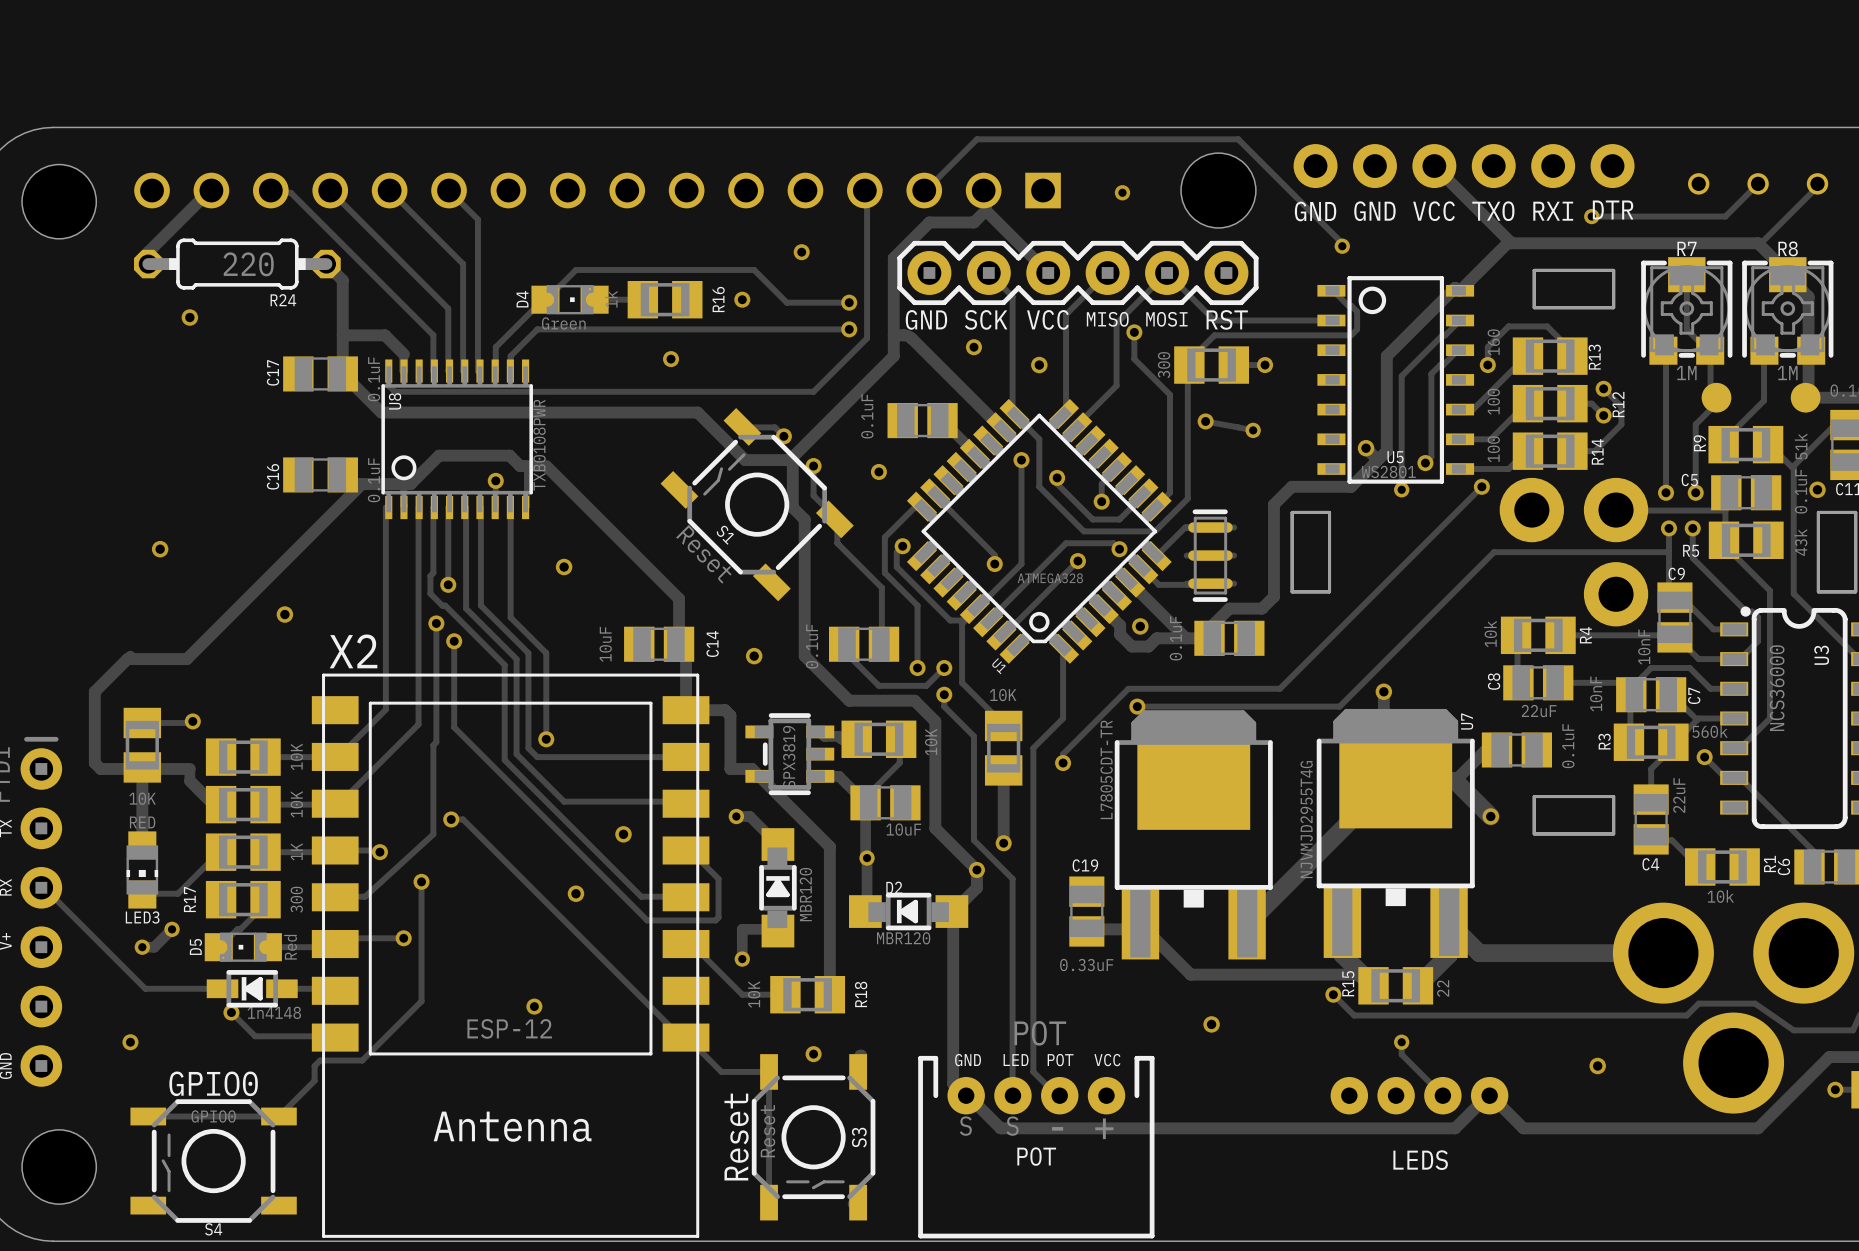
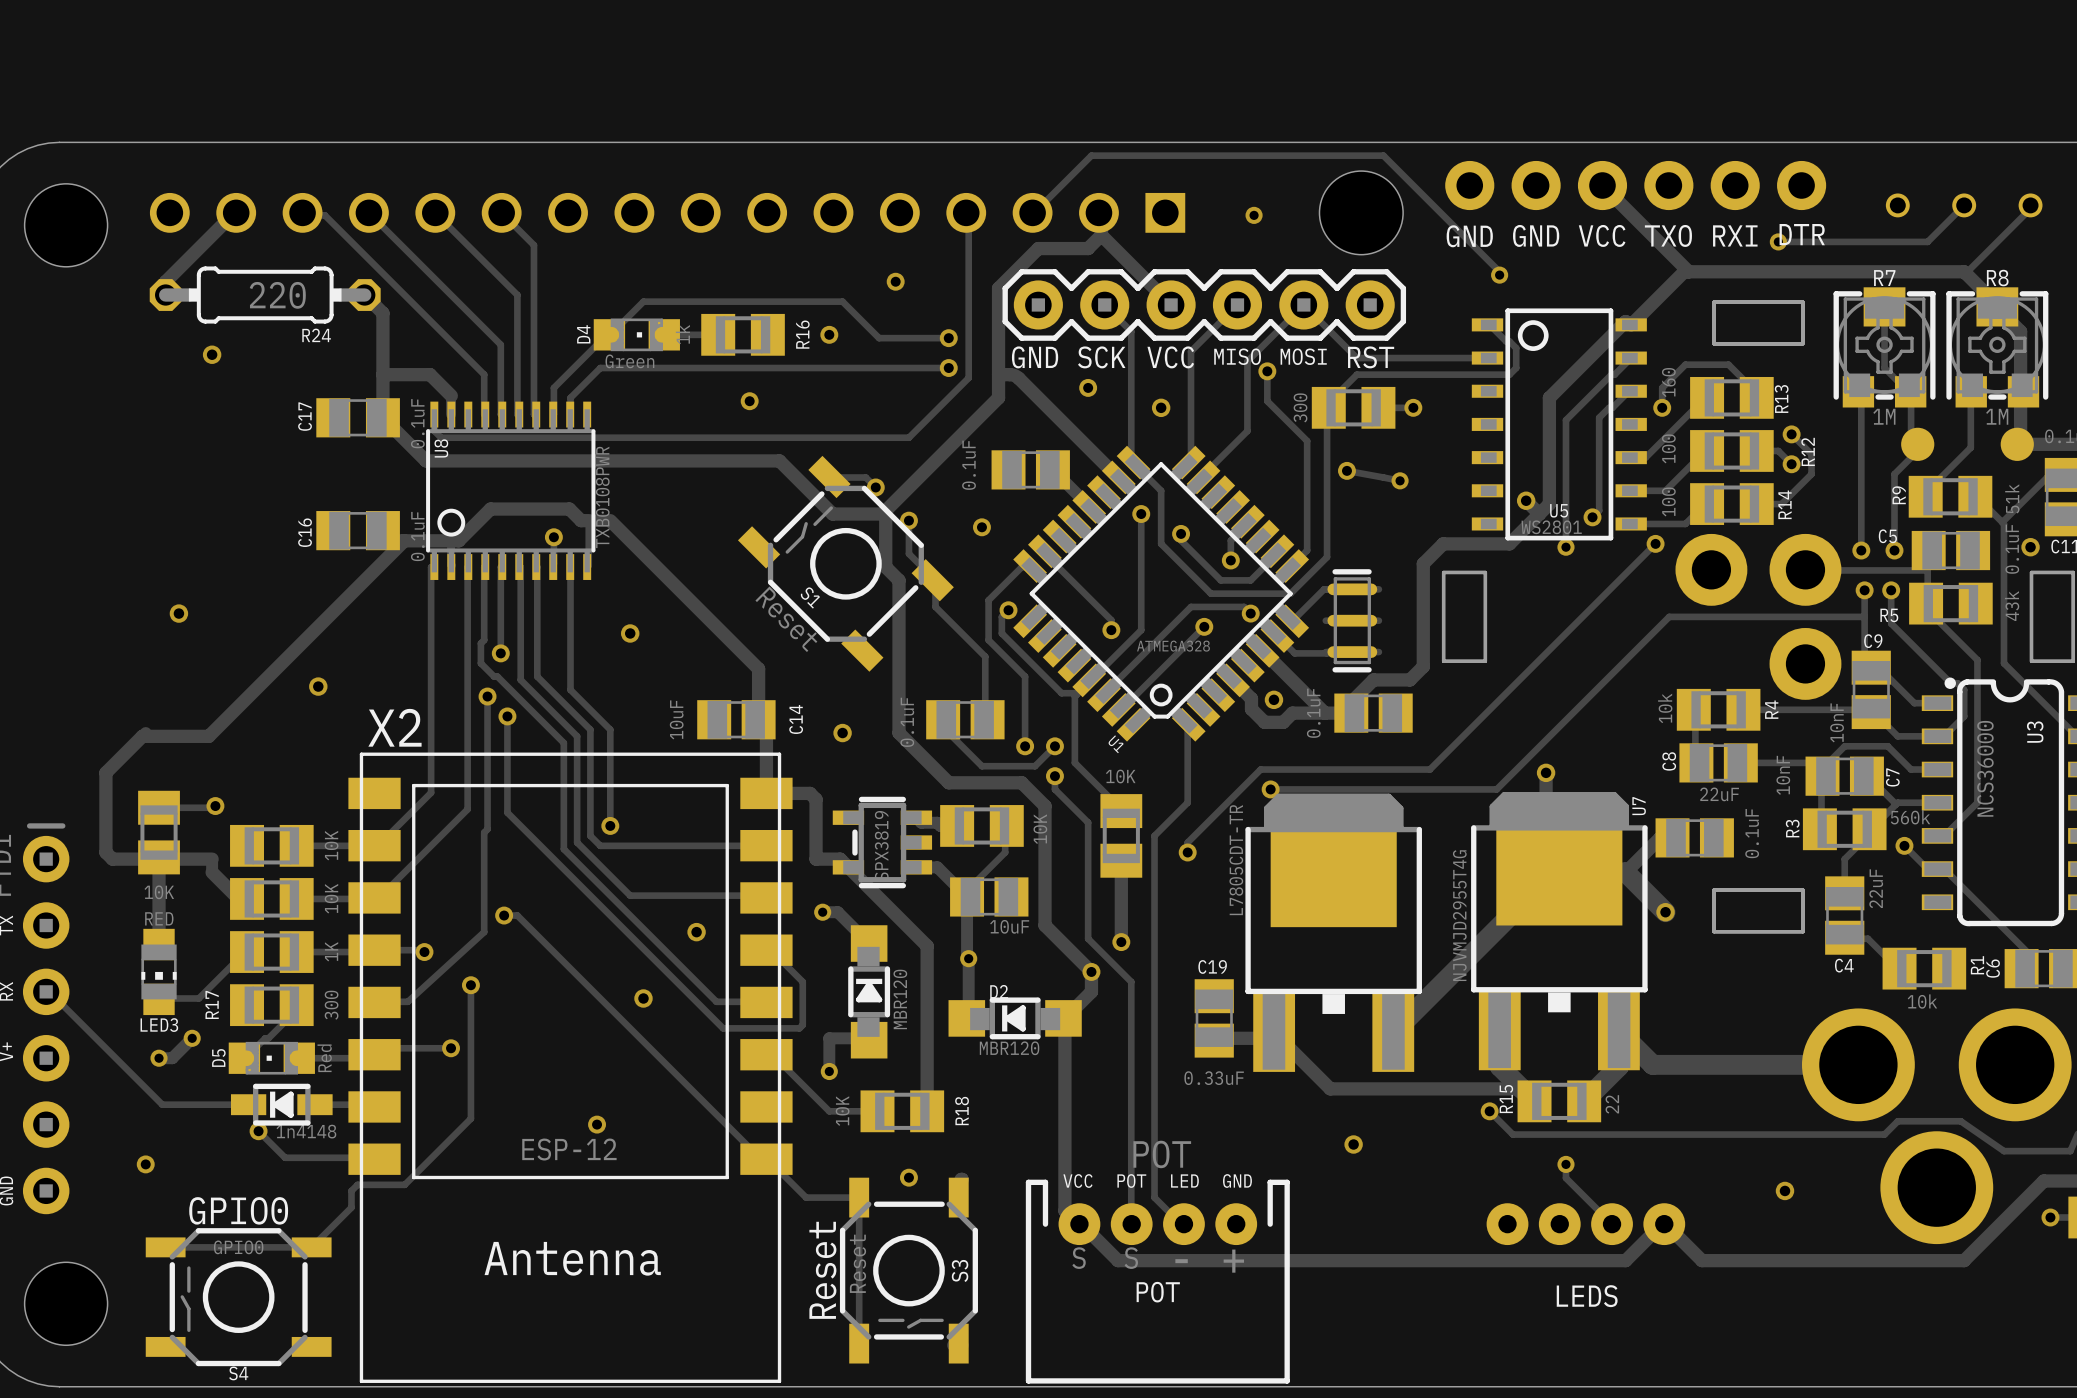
text position: GND (968, 1060) -> GND (1237, 1181)
text position: LED (1016, 1060) -> LED (1184, 1181)
text position: POT (1060, 1060) -> POT (1131, 1181)
text position: VCC (1107, 1060) -> VCC (1077, 1181)

